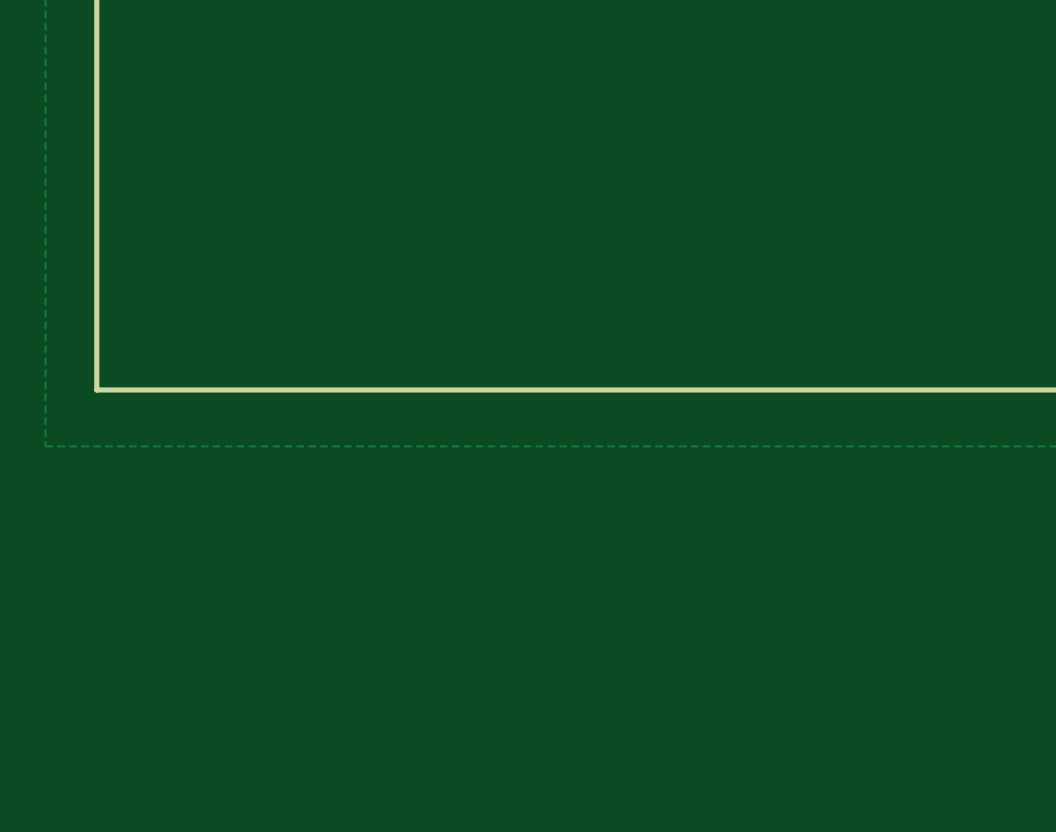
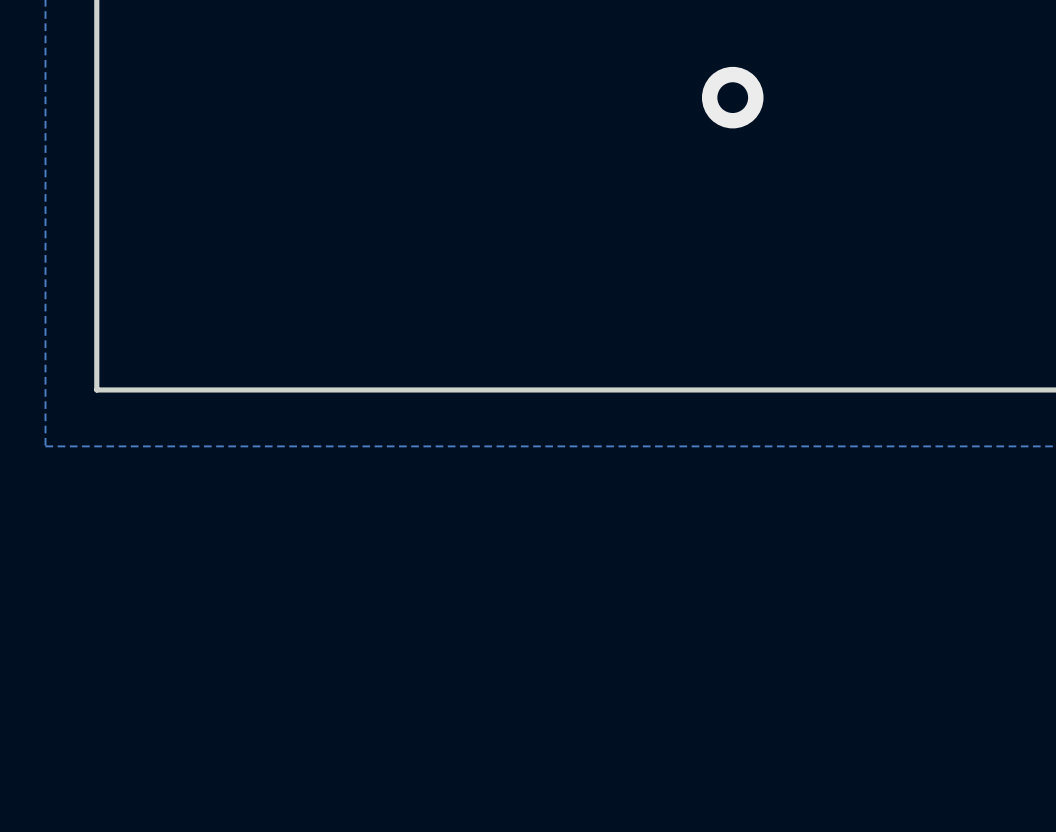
via: none -> (732, 97)

